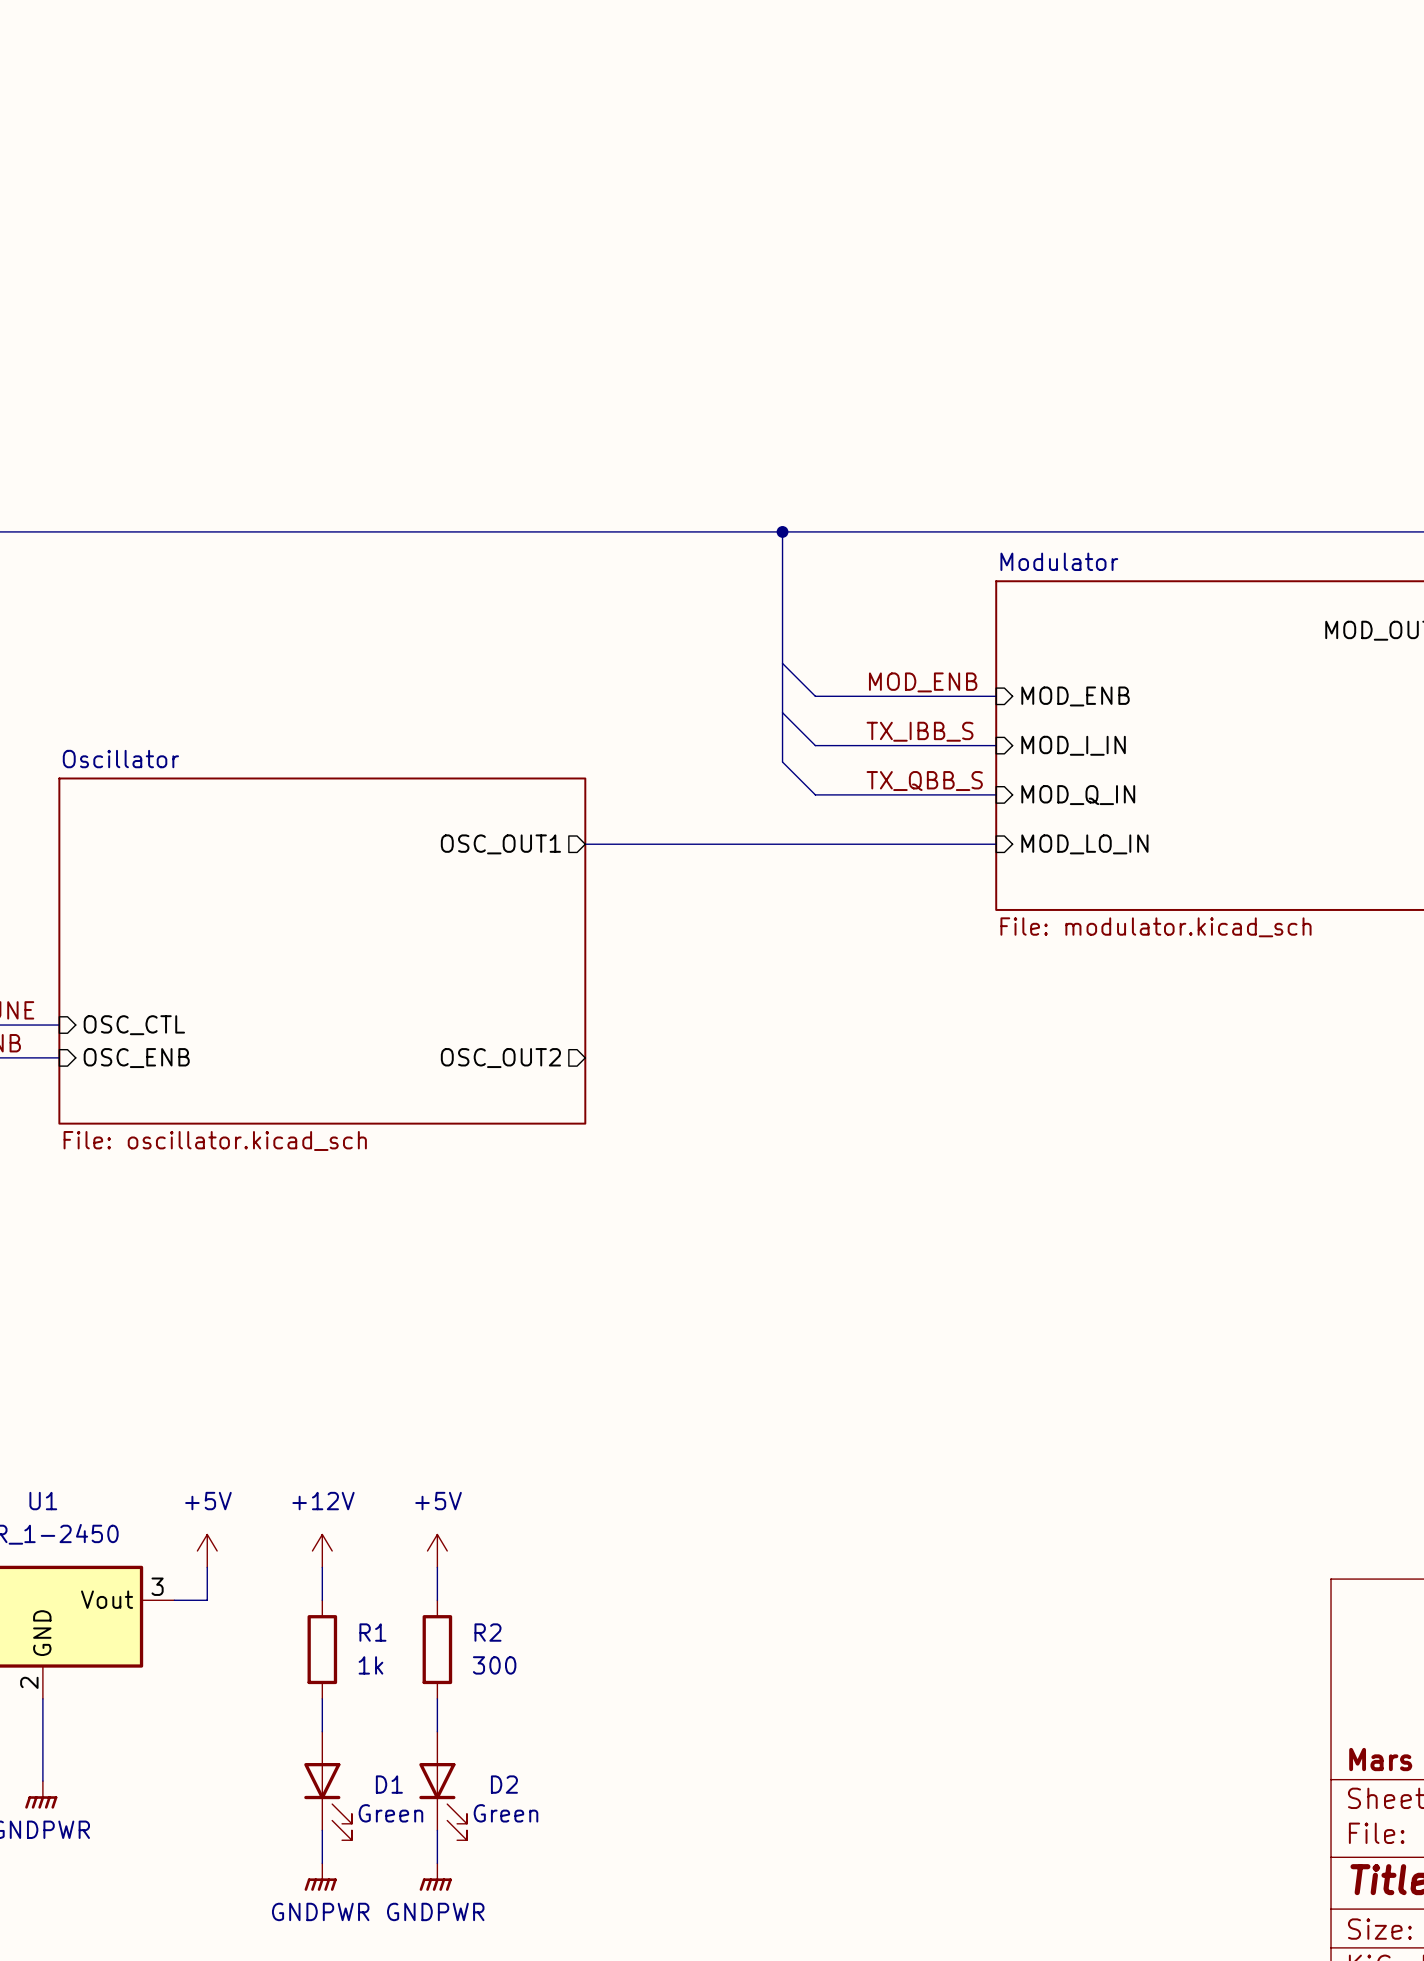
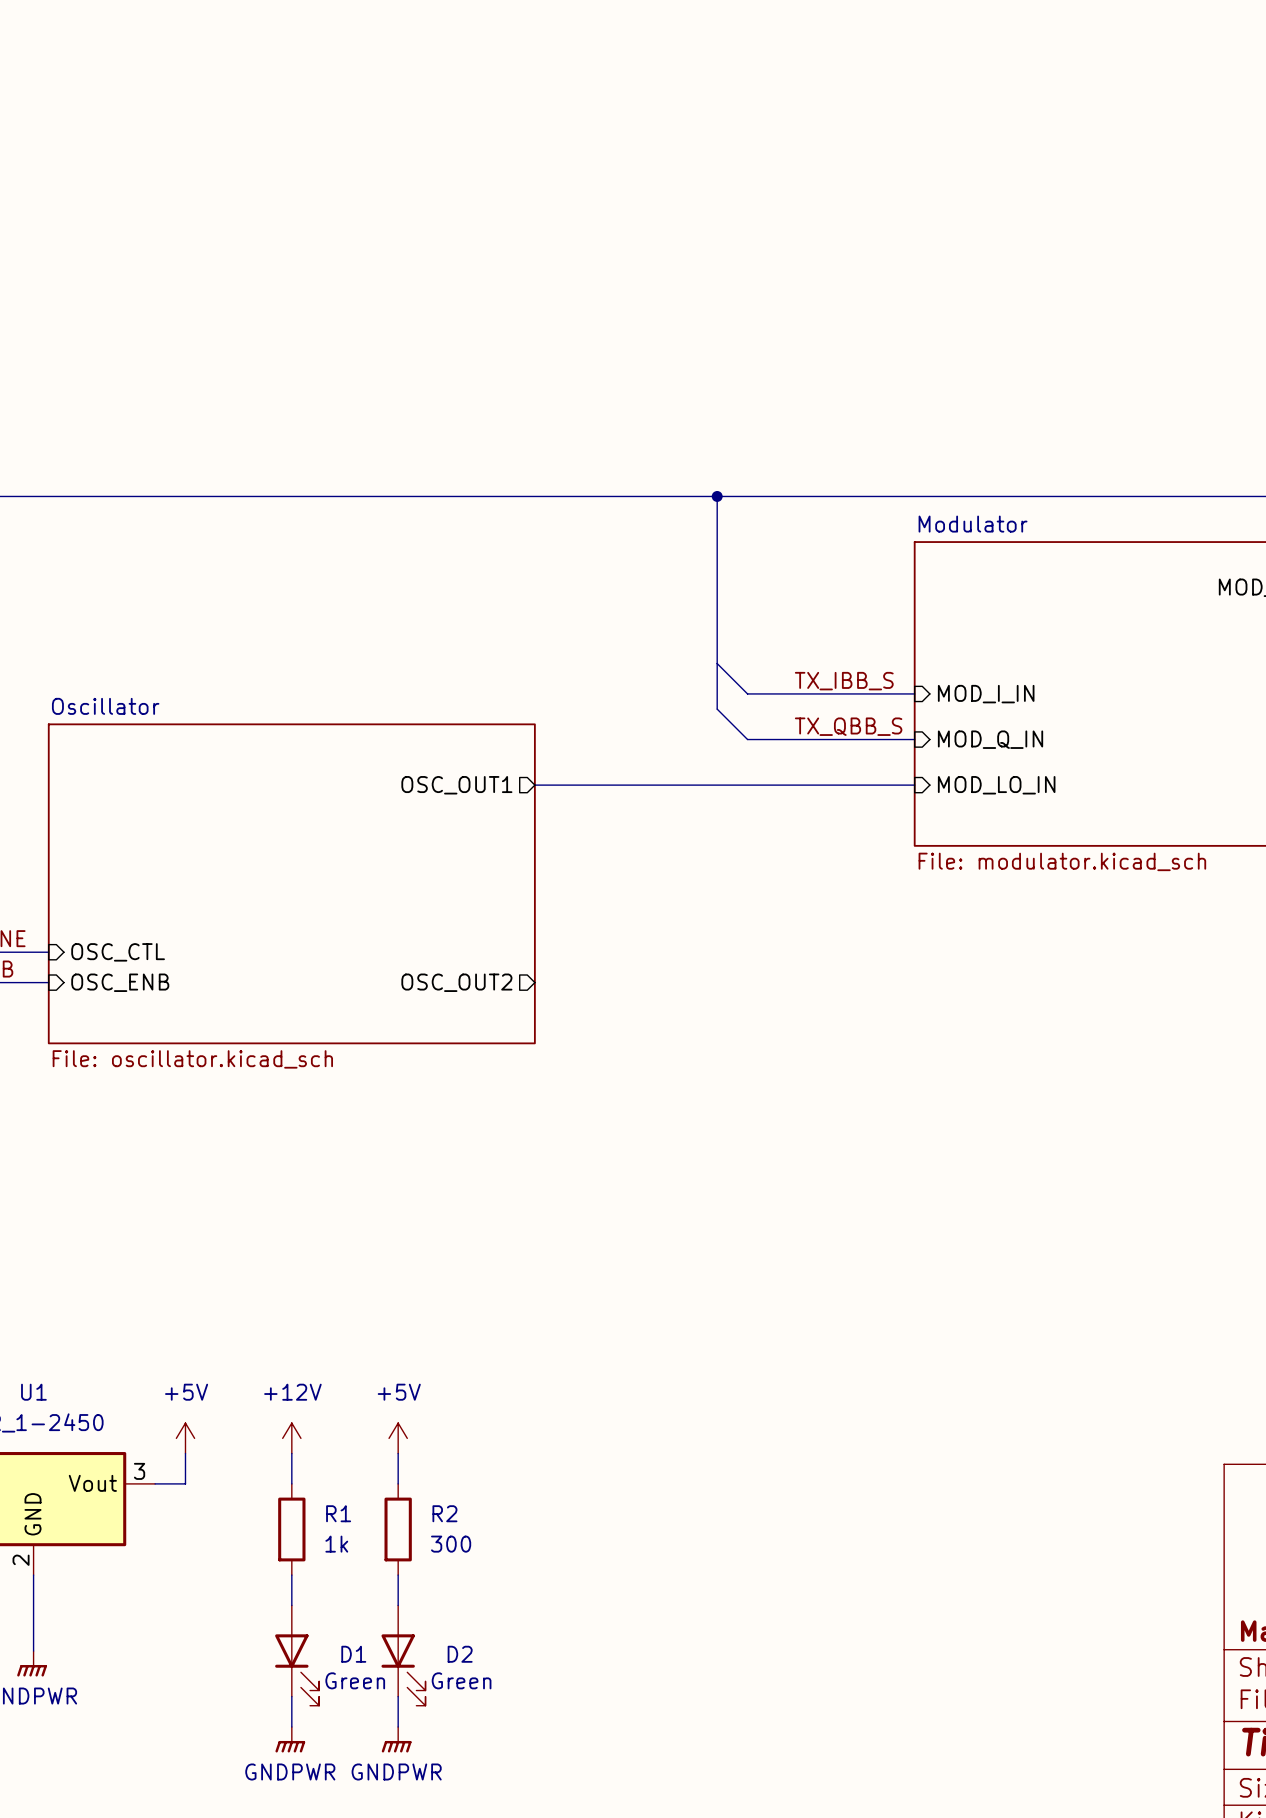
wire: (782, 663) (815, 696) (996, 696) -> none
label: MOD_ENB (923, 682) -> none
sheet pin: MOD_ENB (1075, 696) -> none

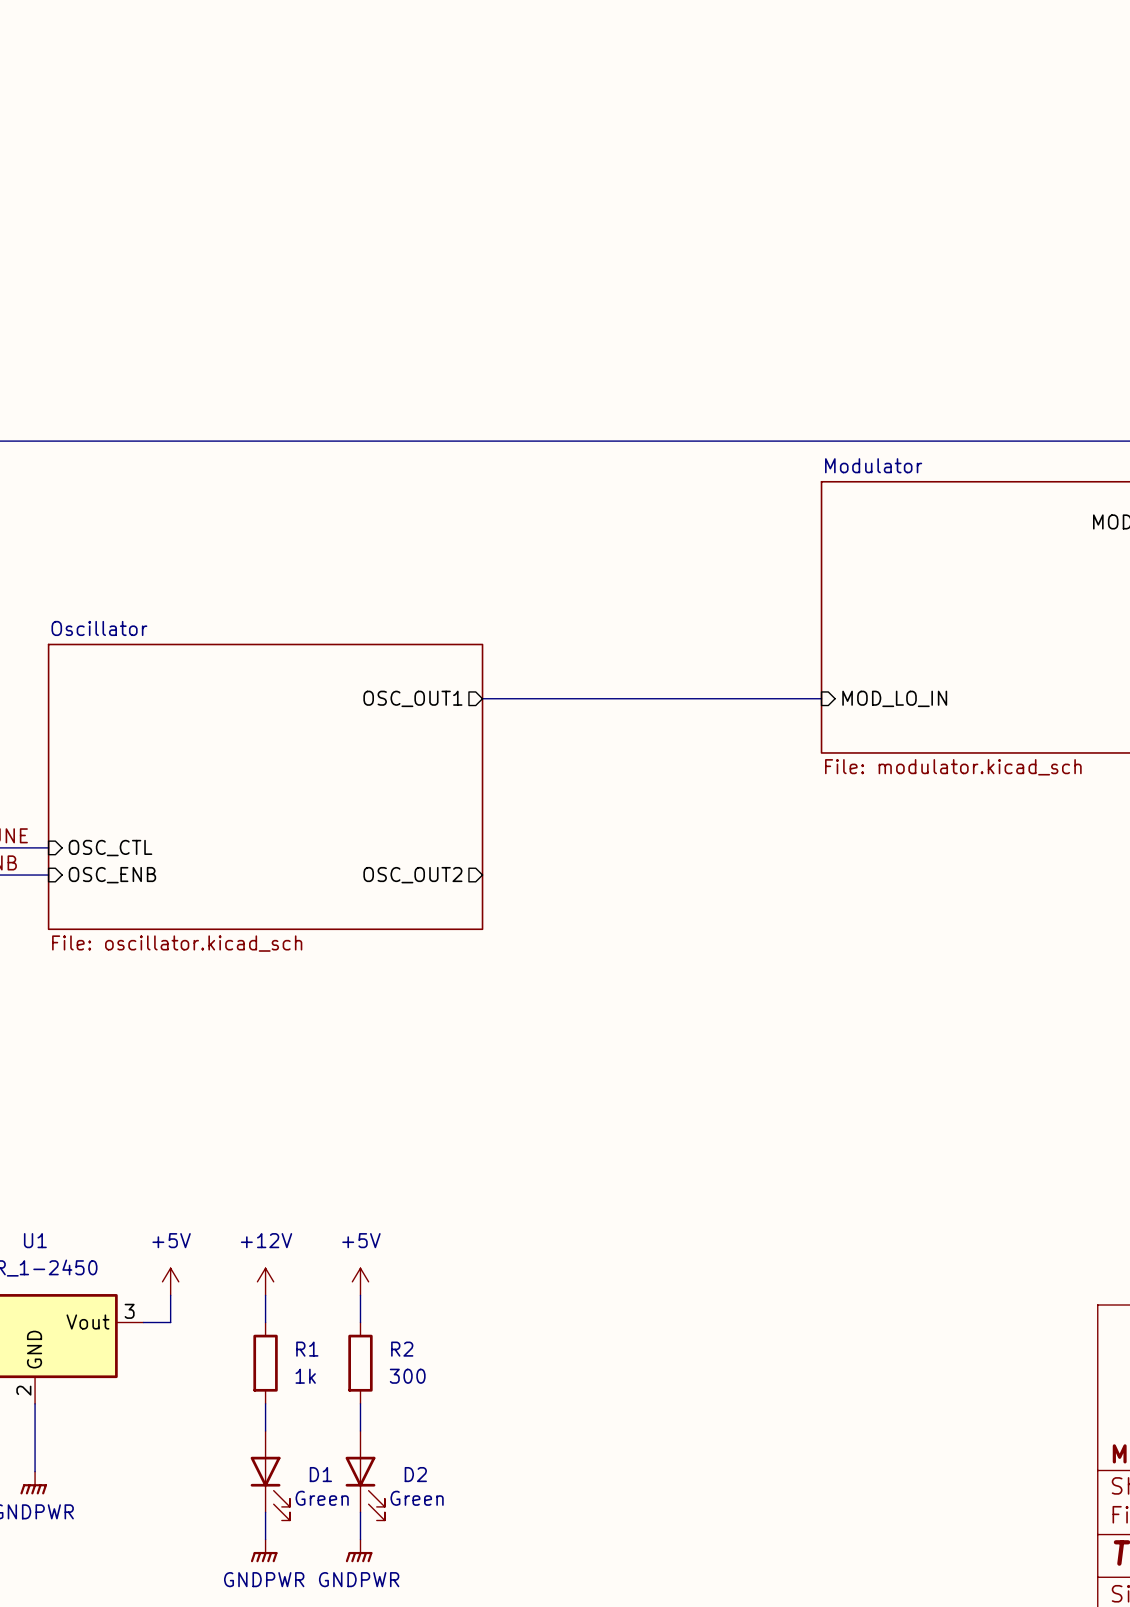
bus: (717, 496) (717, 709) -> none
junction: (717, 496) -> none
wire: (717, 663) (747, 693) (914, 693) -> none
label: TX_IBB_S (844, 681) -> none
sheet pin: MOD_I_IN (986, 694) -> none
wire: (717, 709) (747, 739) (914, 739) -> none
label: TX_QBB_S (848, 726) -> none
sheet pin: MOD_Q_IN (990, 739) -> none

